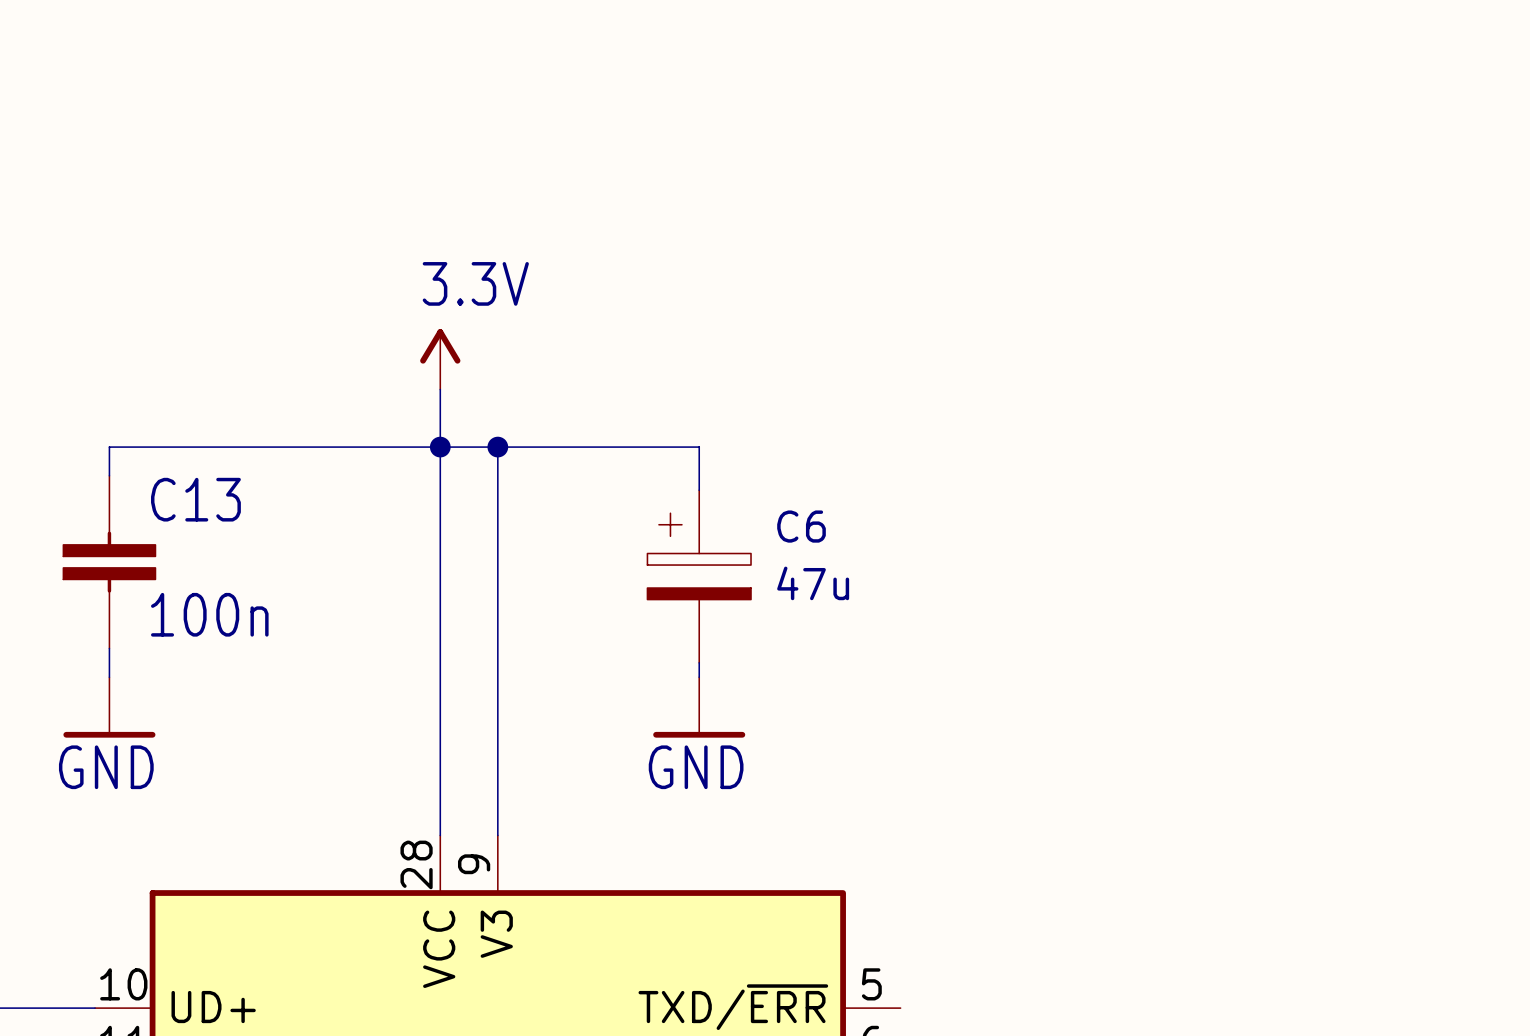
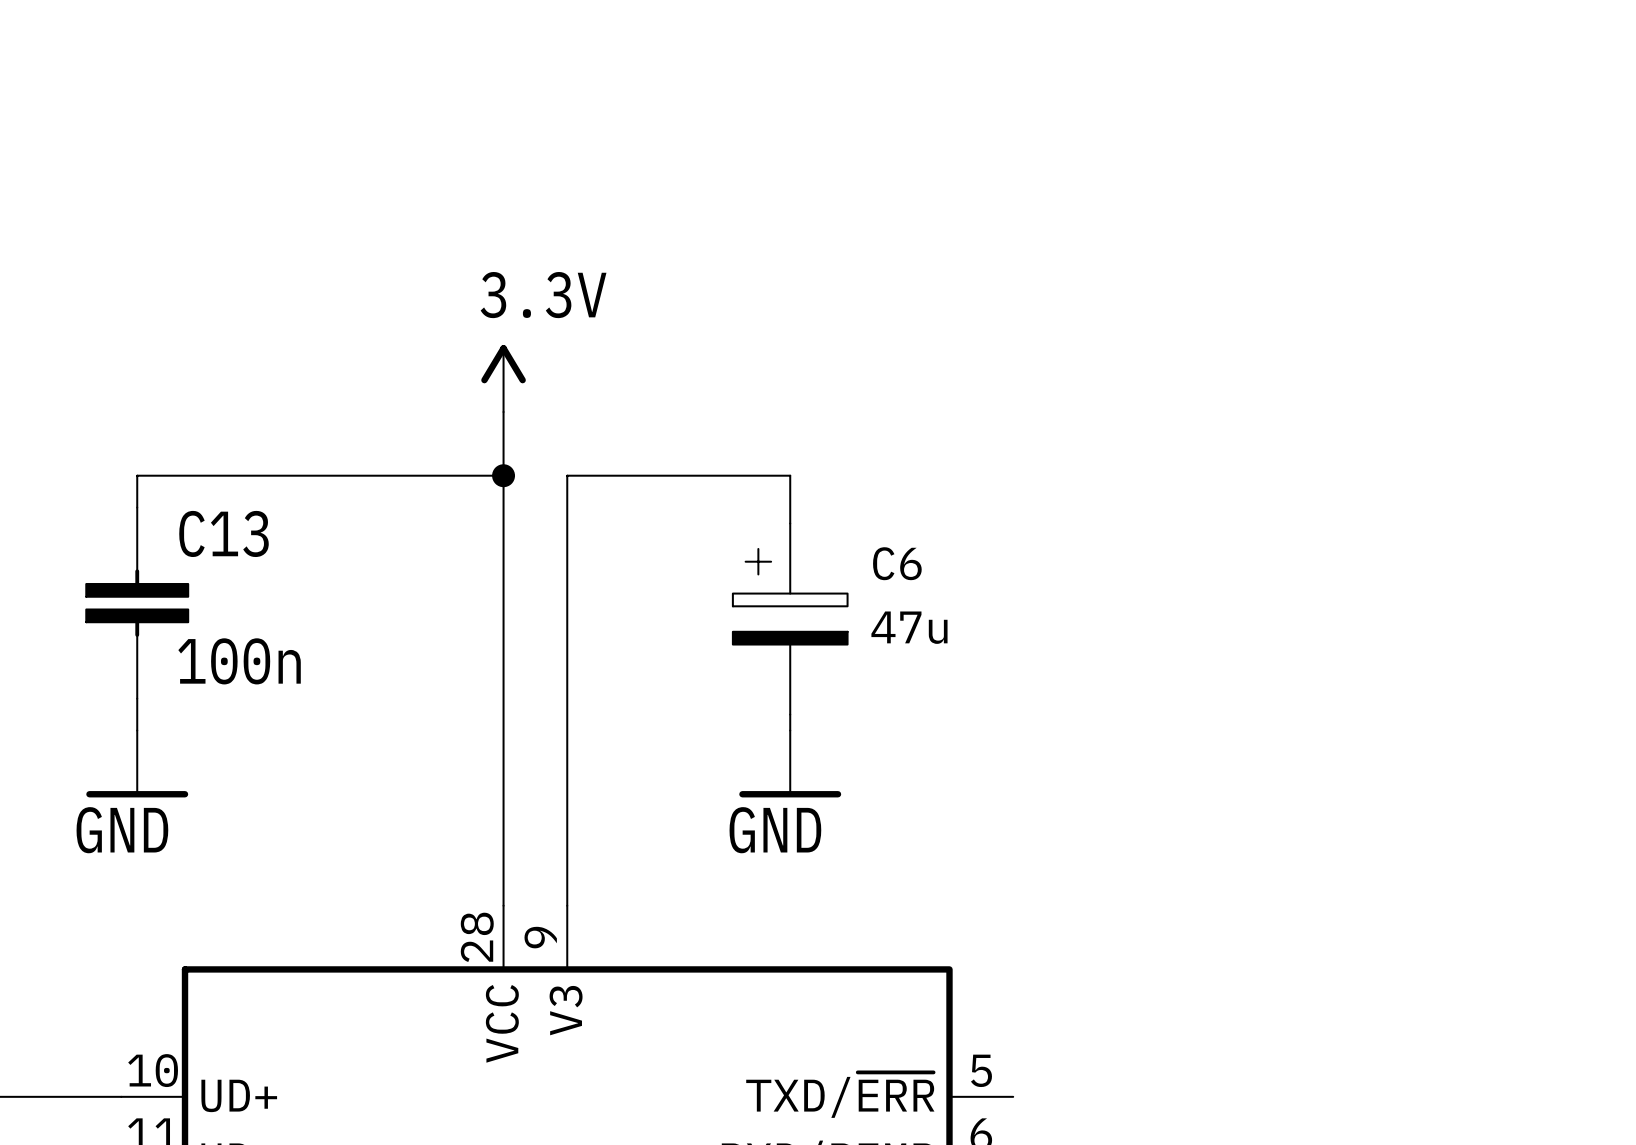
wire: (440, 447) (497, 447) -> none
junction: (497, 447) -> none

